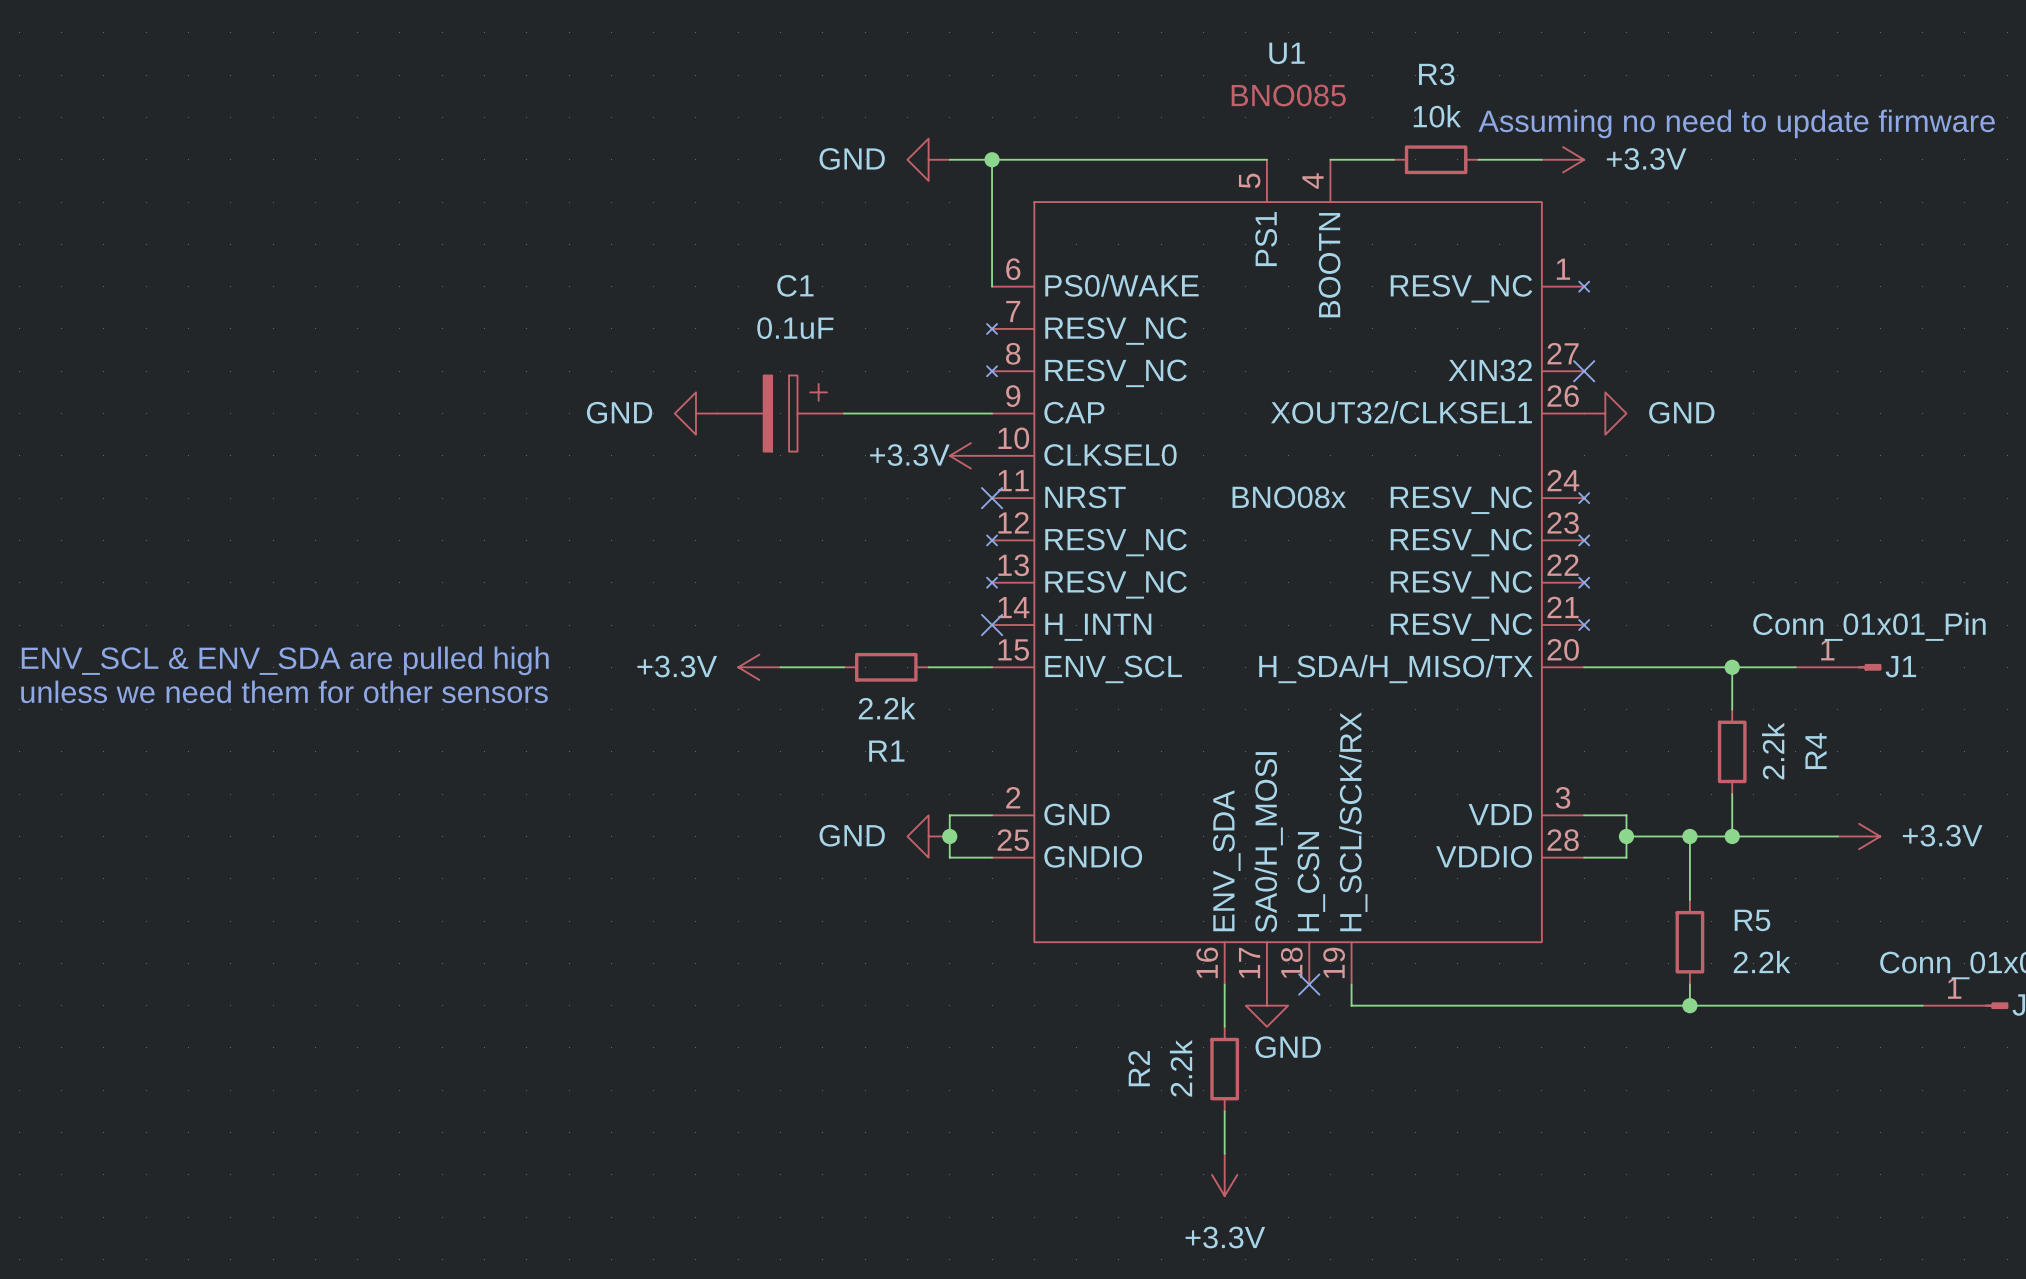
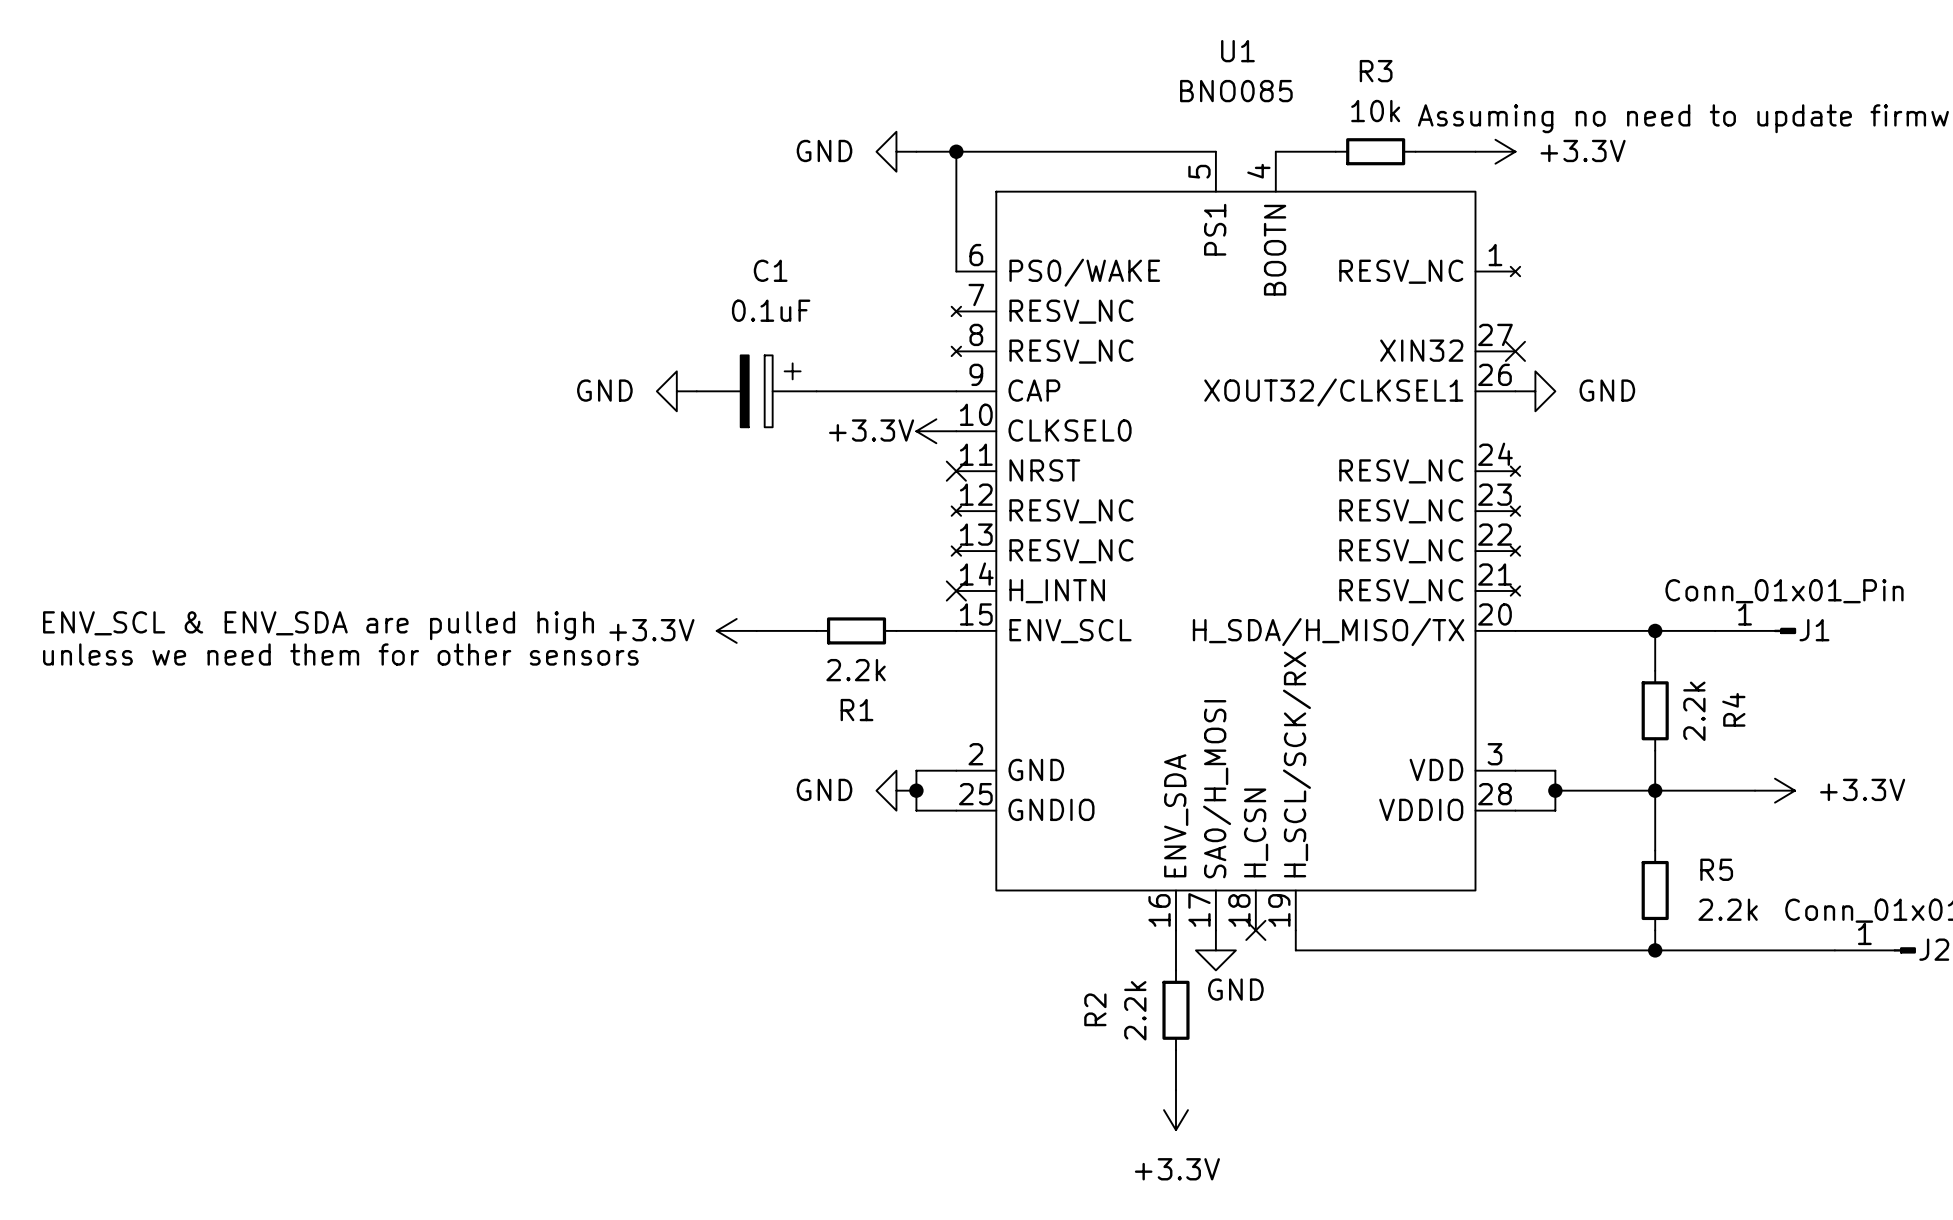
U1 value: BNO08x (1289, 497) -> none
wire: (1689, 836) (1689, 899) -> (1655, 790) (1655, 850)
junction: (1689, 836) -> none
R5 position: (1689, 942) -> (1655, 890)
wire: (1689, 984) (1689, 1005) -> (1655, 930) (1655, 950)
junction position: (1689, 1005) -> (1655, 950)

